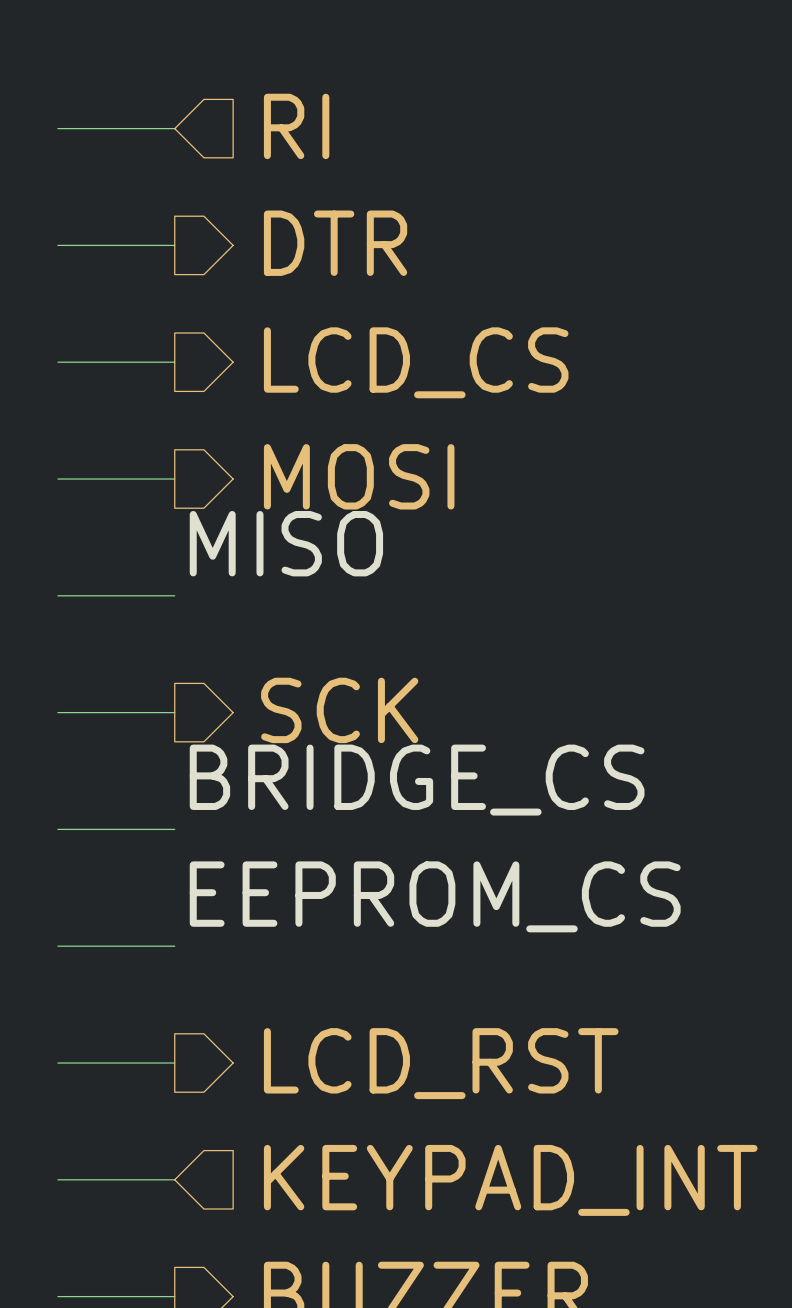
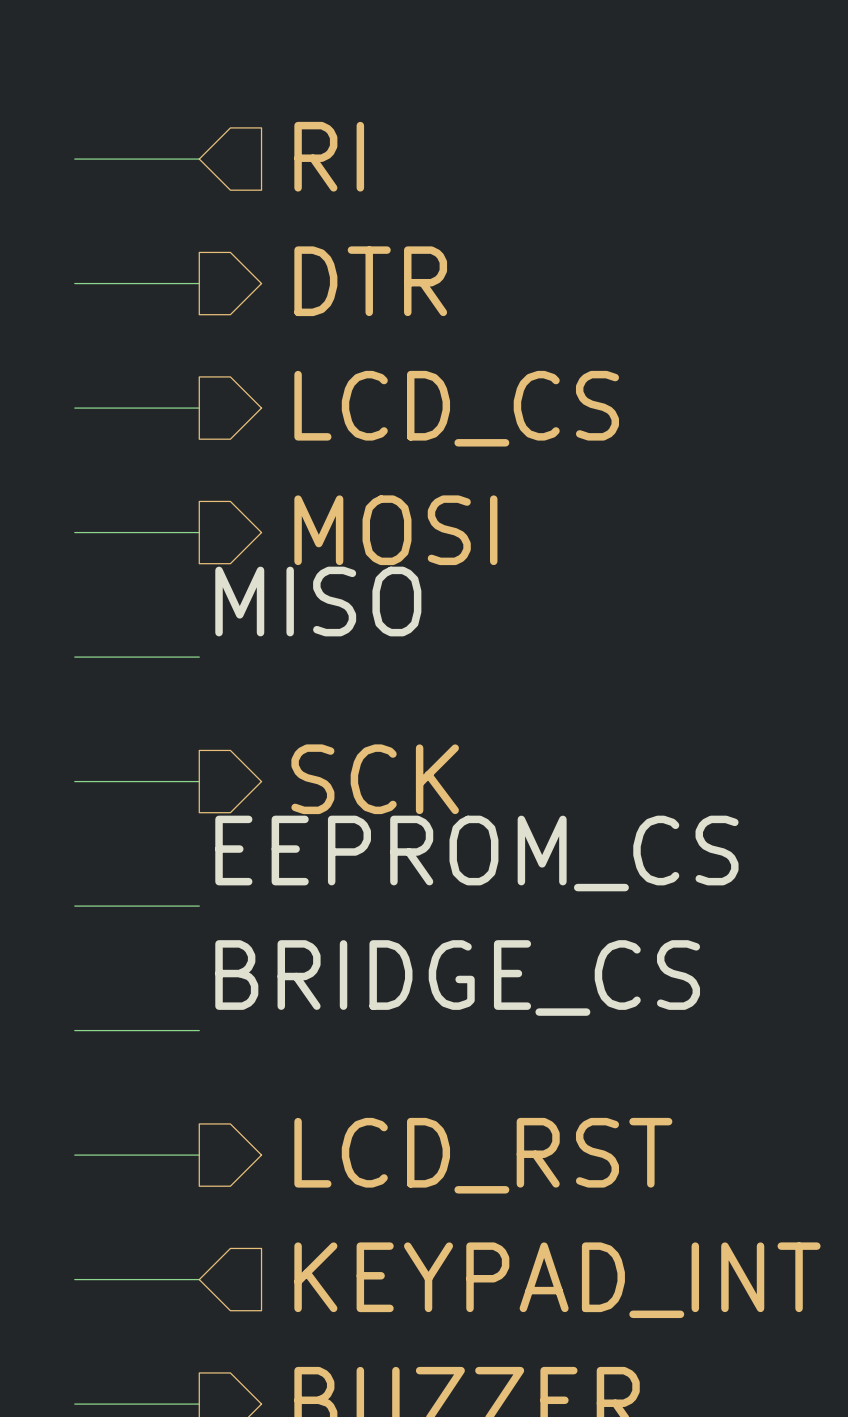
label: BRIDGE_CS (417, 780) -> EEPROM_CS (476, 853)
label: EEPROM_CS (435, 896) -> BRIDGE_CS (457, 977)

